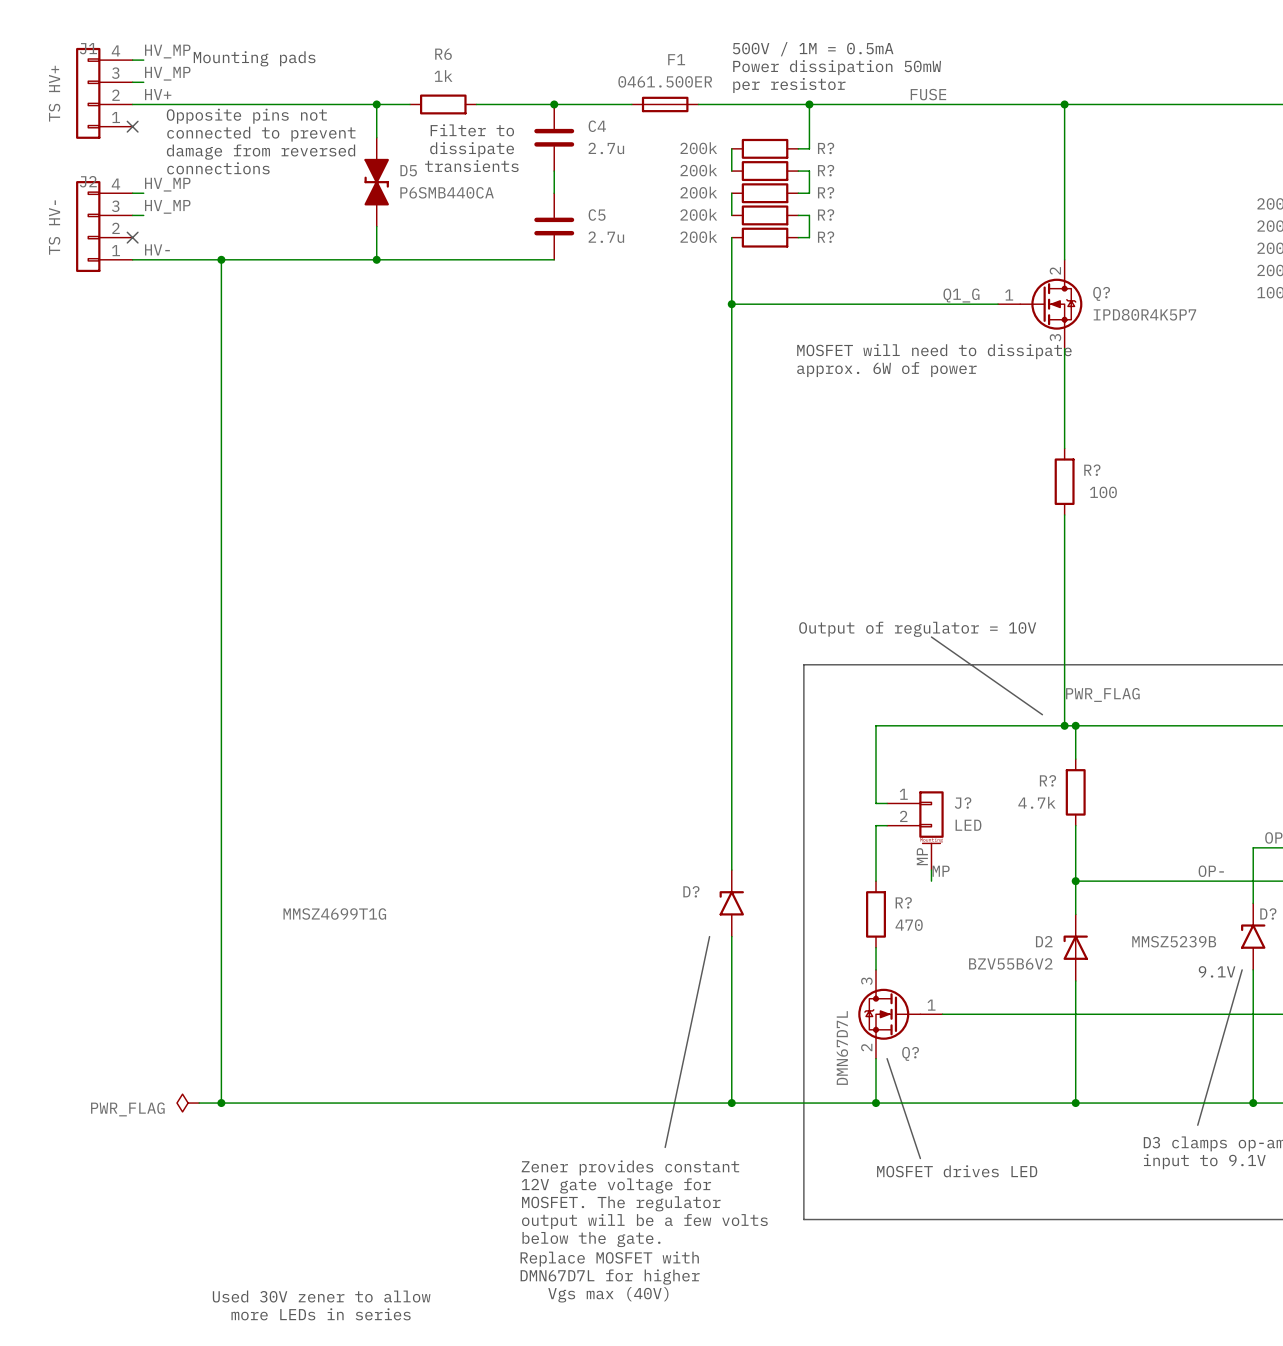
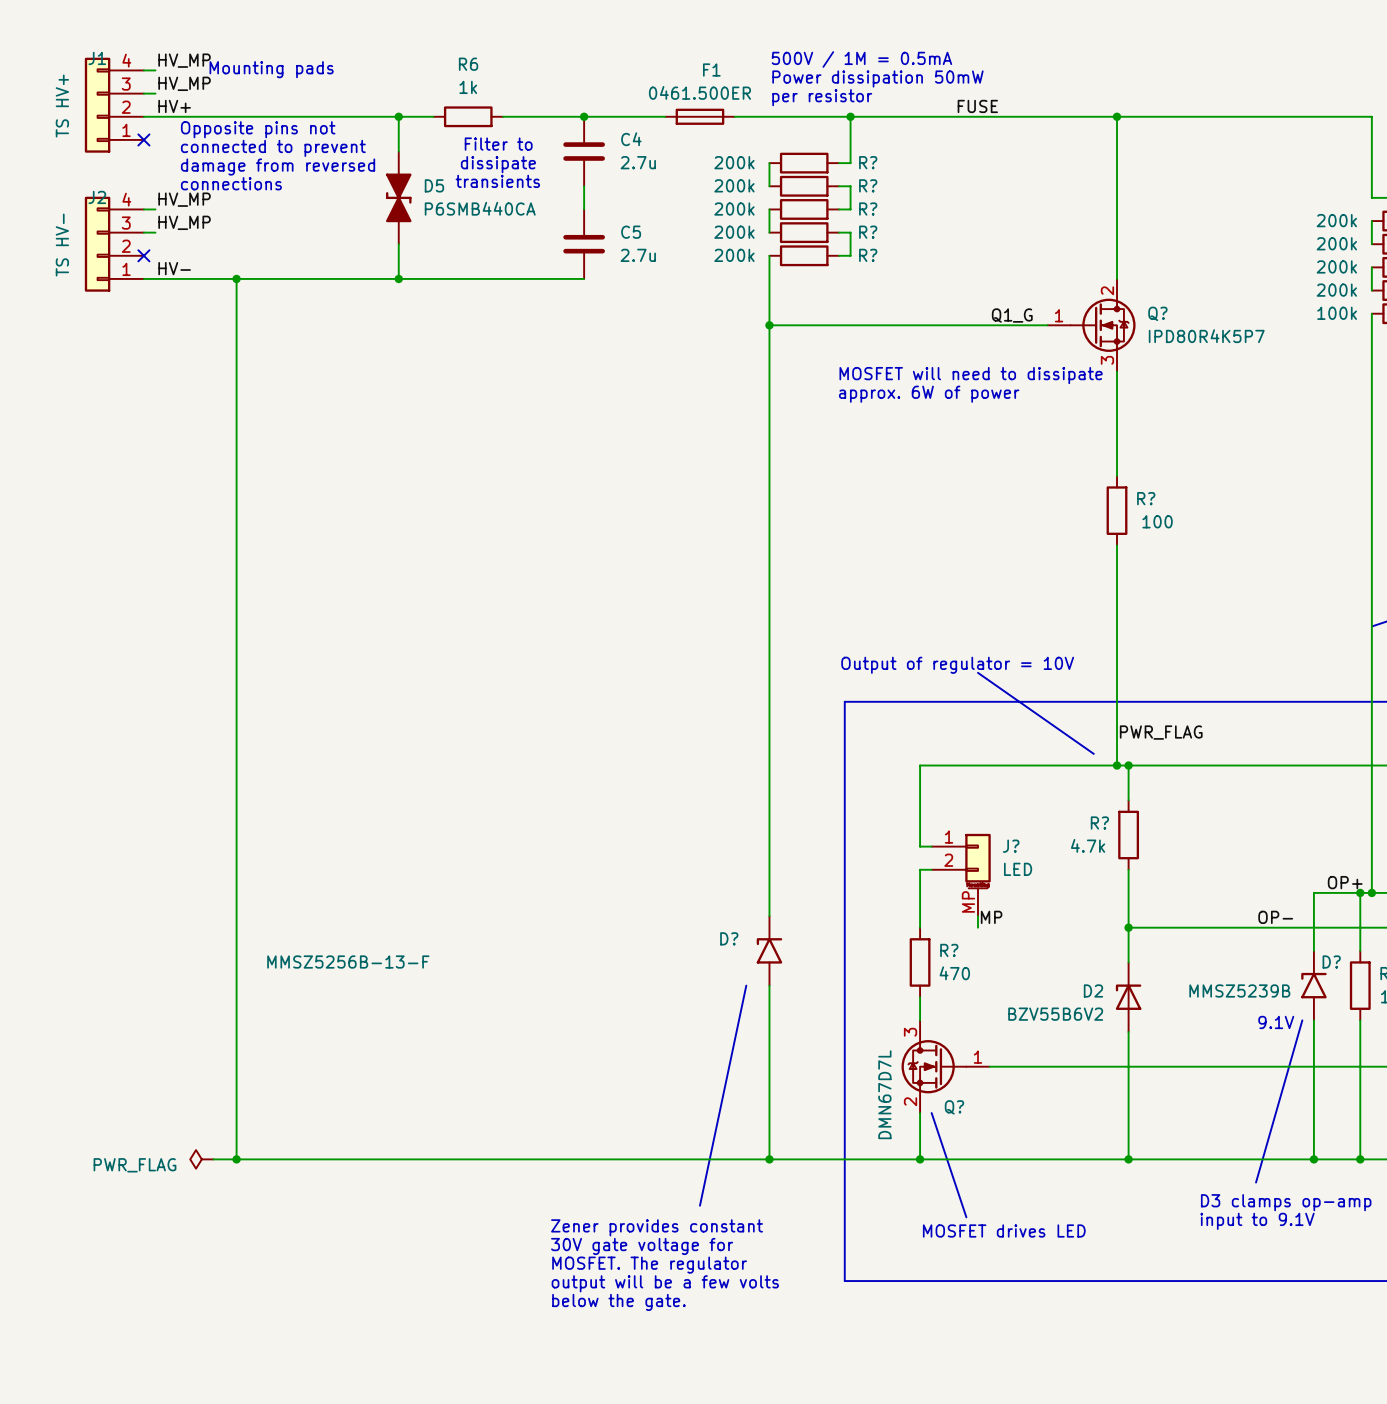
D? value: MMSZ4699T1G (334, 914) -> MMSZ5256B-13-F (348, 962)
text: 12V gate voltage for (616, 1185) -> 30V gate voltage for (642, 1246)
text: Replace MOSFET with (609, 1259) -> none
text: DMN67D7L for higher (610, 1277) -> none
text: Vgs max (40V) (608, 1294) -> none
text: Used 30V zener to allow (321, 1296) -> none
text: more LEDs in series (321, 1314) -> none

